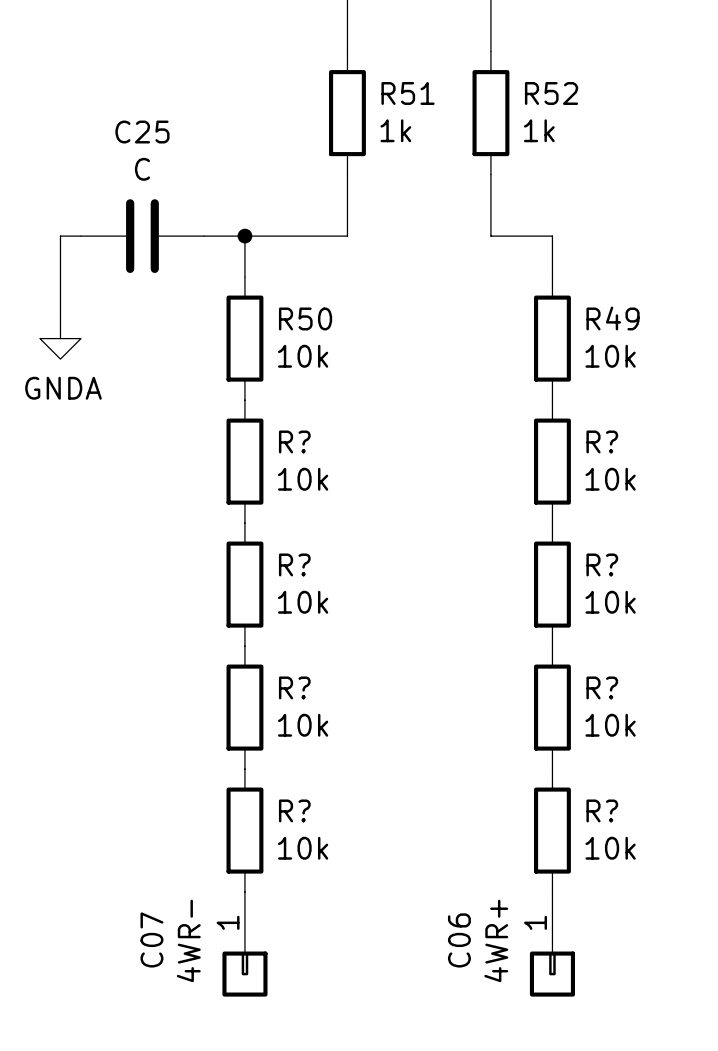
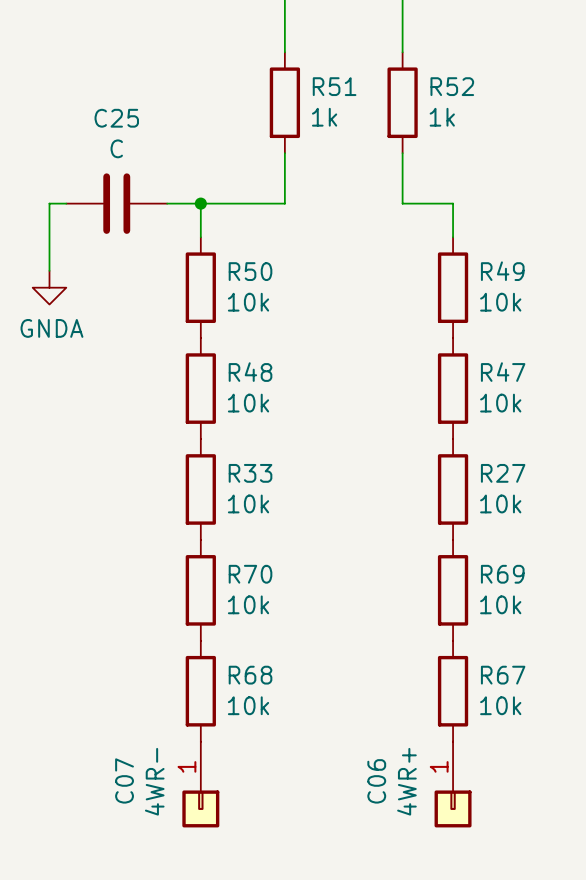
R? name: R? (294, 441) -> R48 (250, 372)
R? name: R? (602, 441) -> R47 (503, 372)
R? name: R? (294, 564) -> R33 (250, 473)
R? name: R? (602, 564) -> R27 (503, 473)
R? name: R? (294, 687) -> R70 (250, 574)
R? name: R? (602, 687) -> R69 (502, 574)
R? name: R? (294, 810) -> R68 (250, 675)
R? name: R? (602, 810) -> R67 (503, 675)

